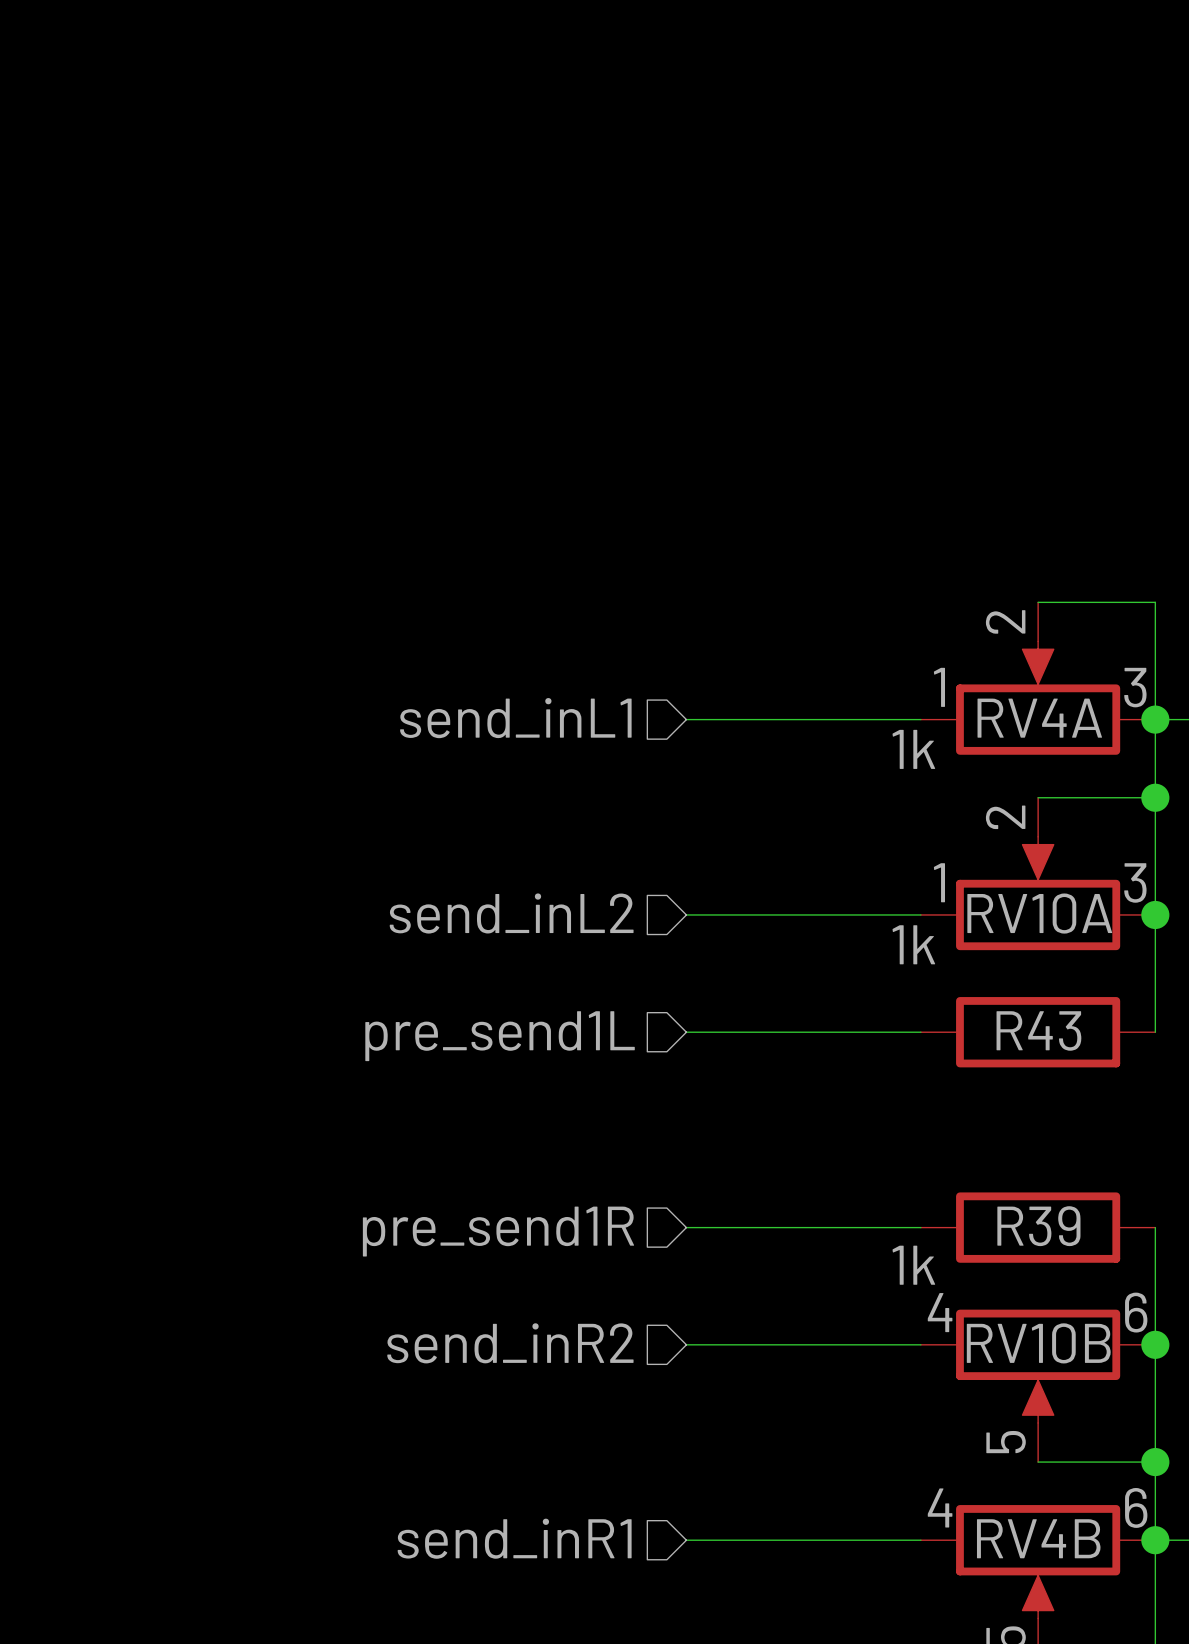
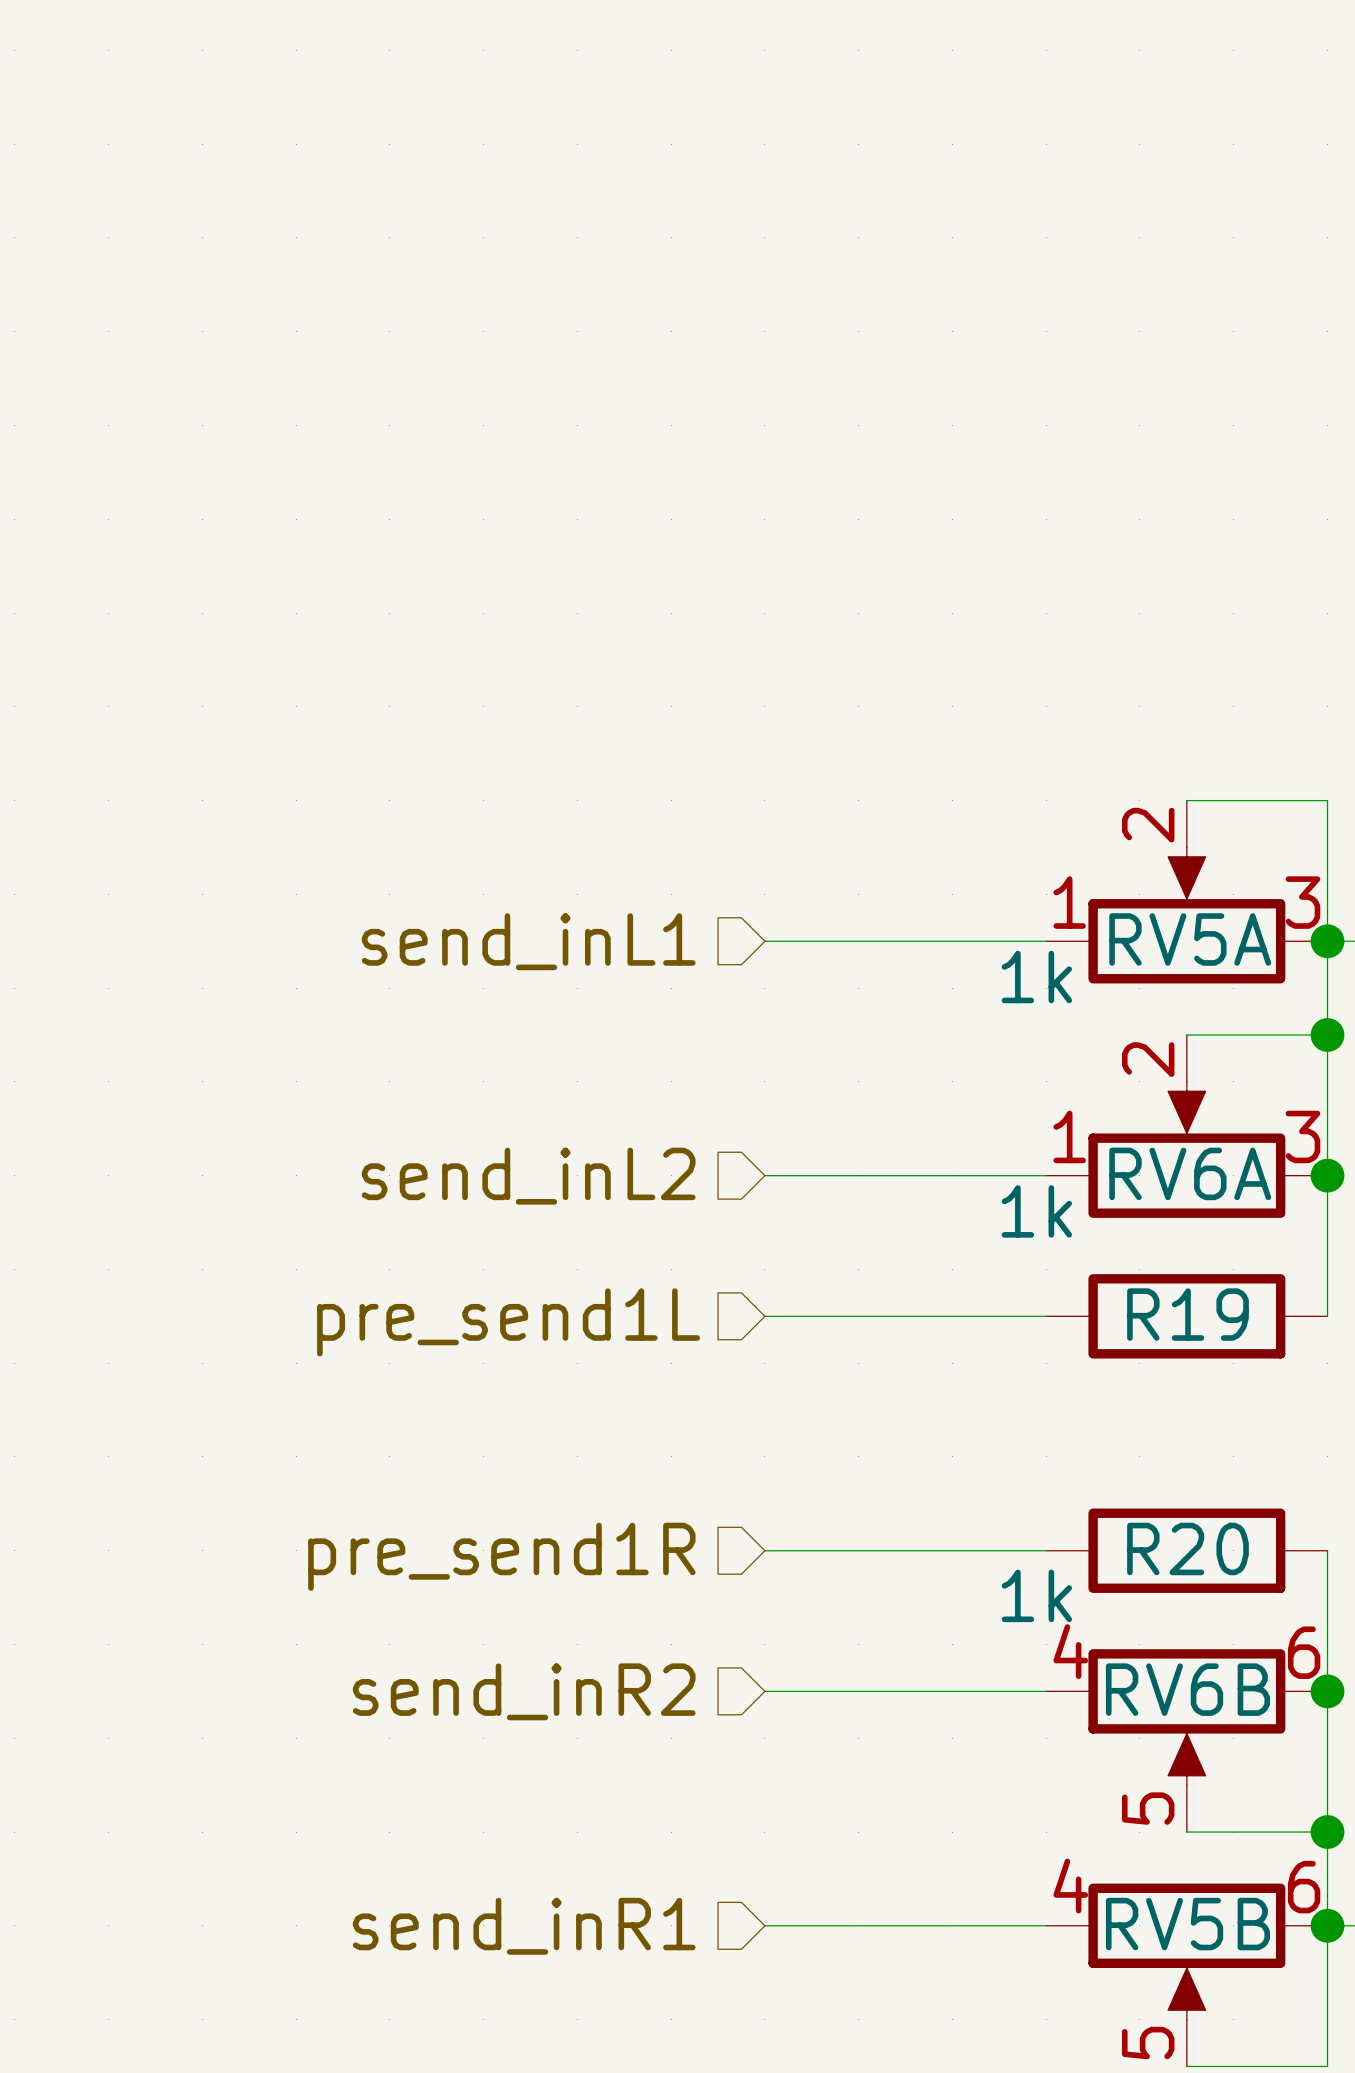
RV4A name: RV4A (1039, 718) -> RV5A (1190, 939)
RV10A name: RV10A (1039, 913) -> RV6A (1190, 1173)
R43 name: R43 (1038, 1030) -> R19 (1187, 1314)
R39 name: R39 (1038, 1226) -> R20 (1187, 1548)
RV10B name: RV10B (1038, 1343) -> RV6B (1187, 1689)
RV4B name: RV4B (1038, 1538) -> RV5B (1187, 1924)

